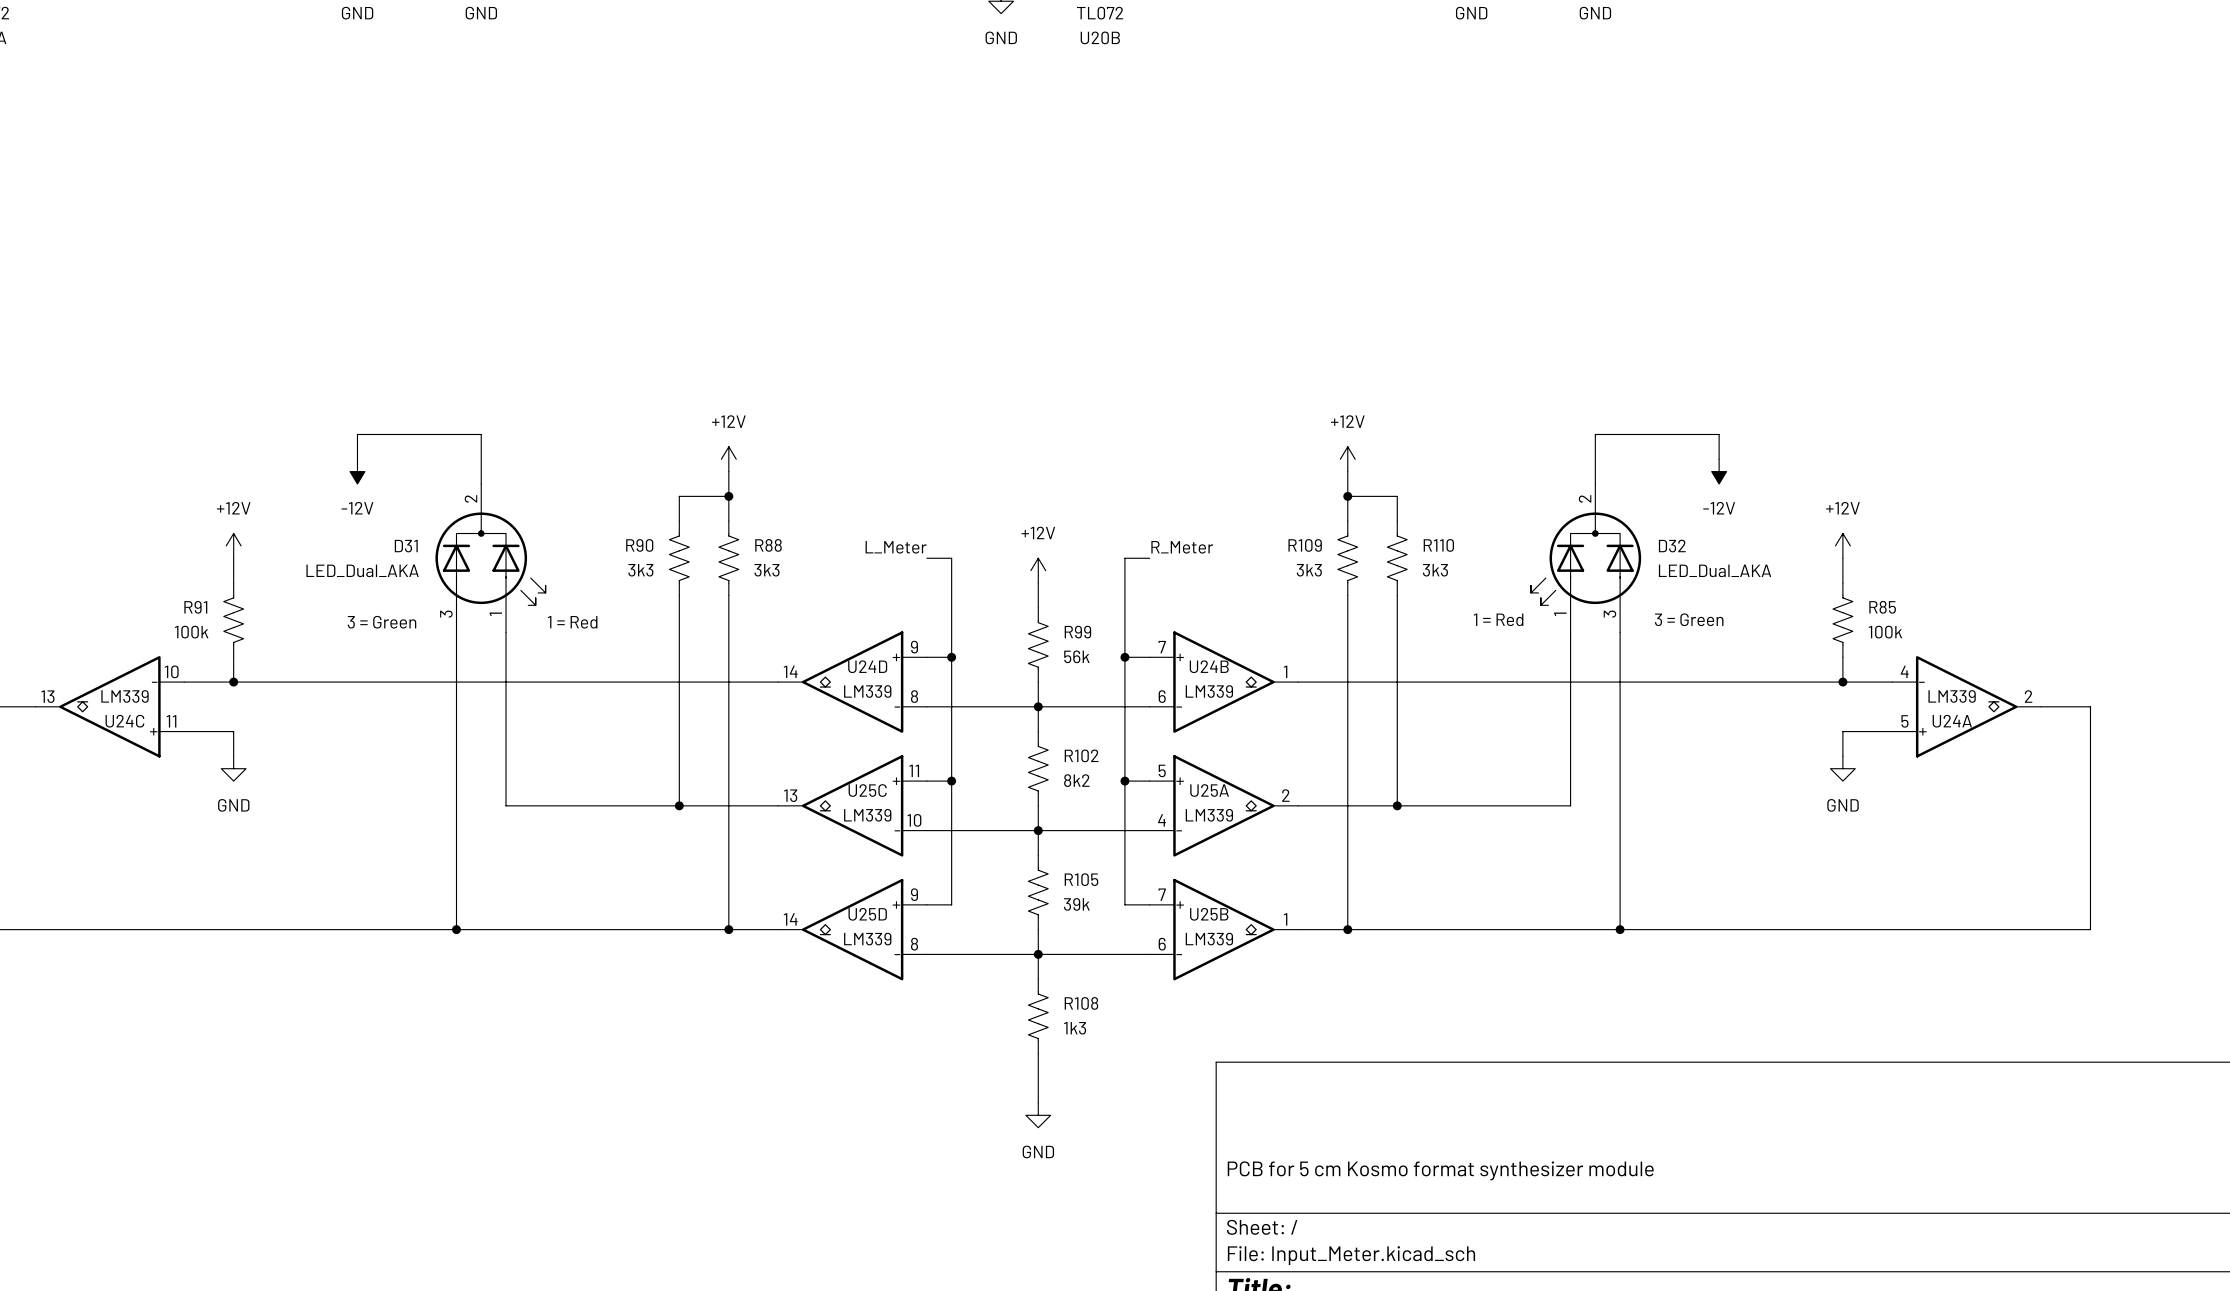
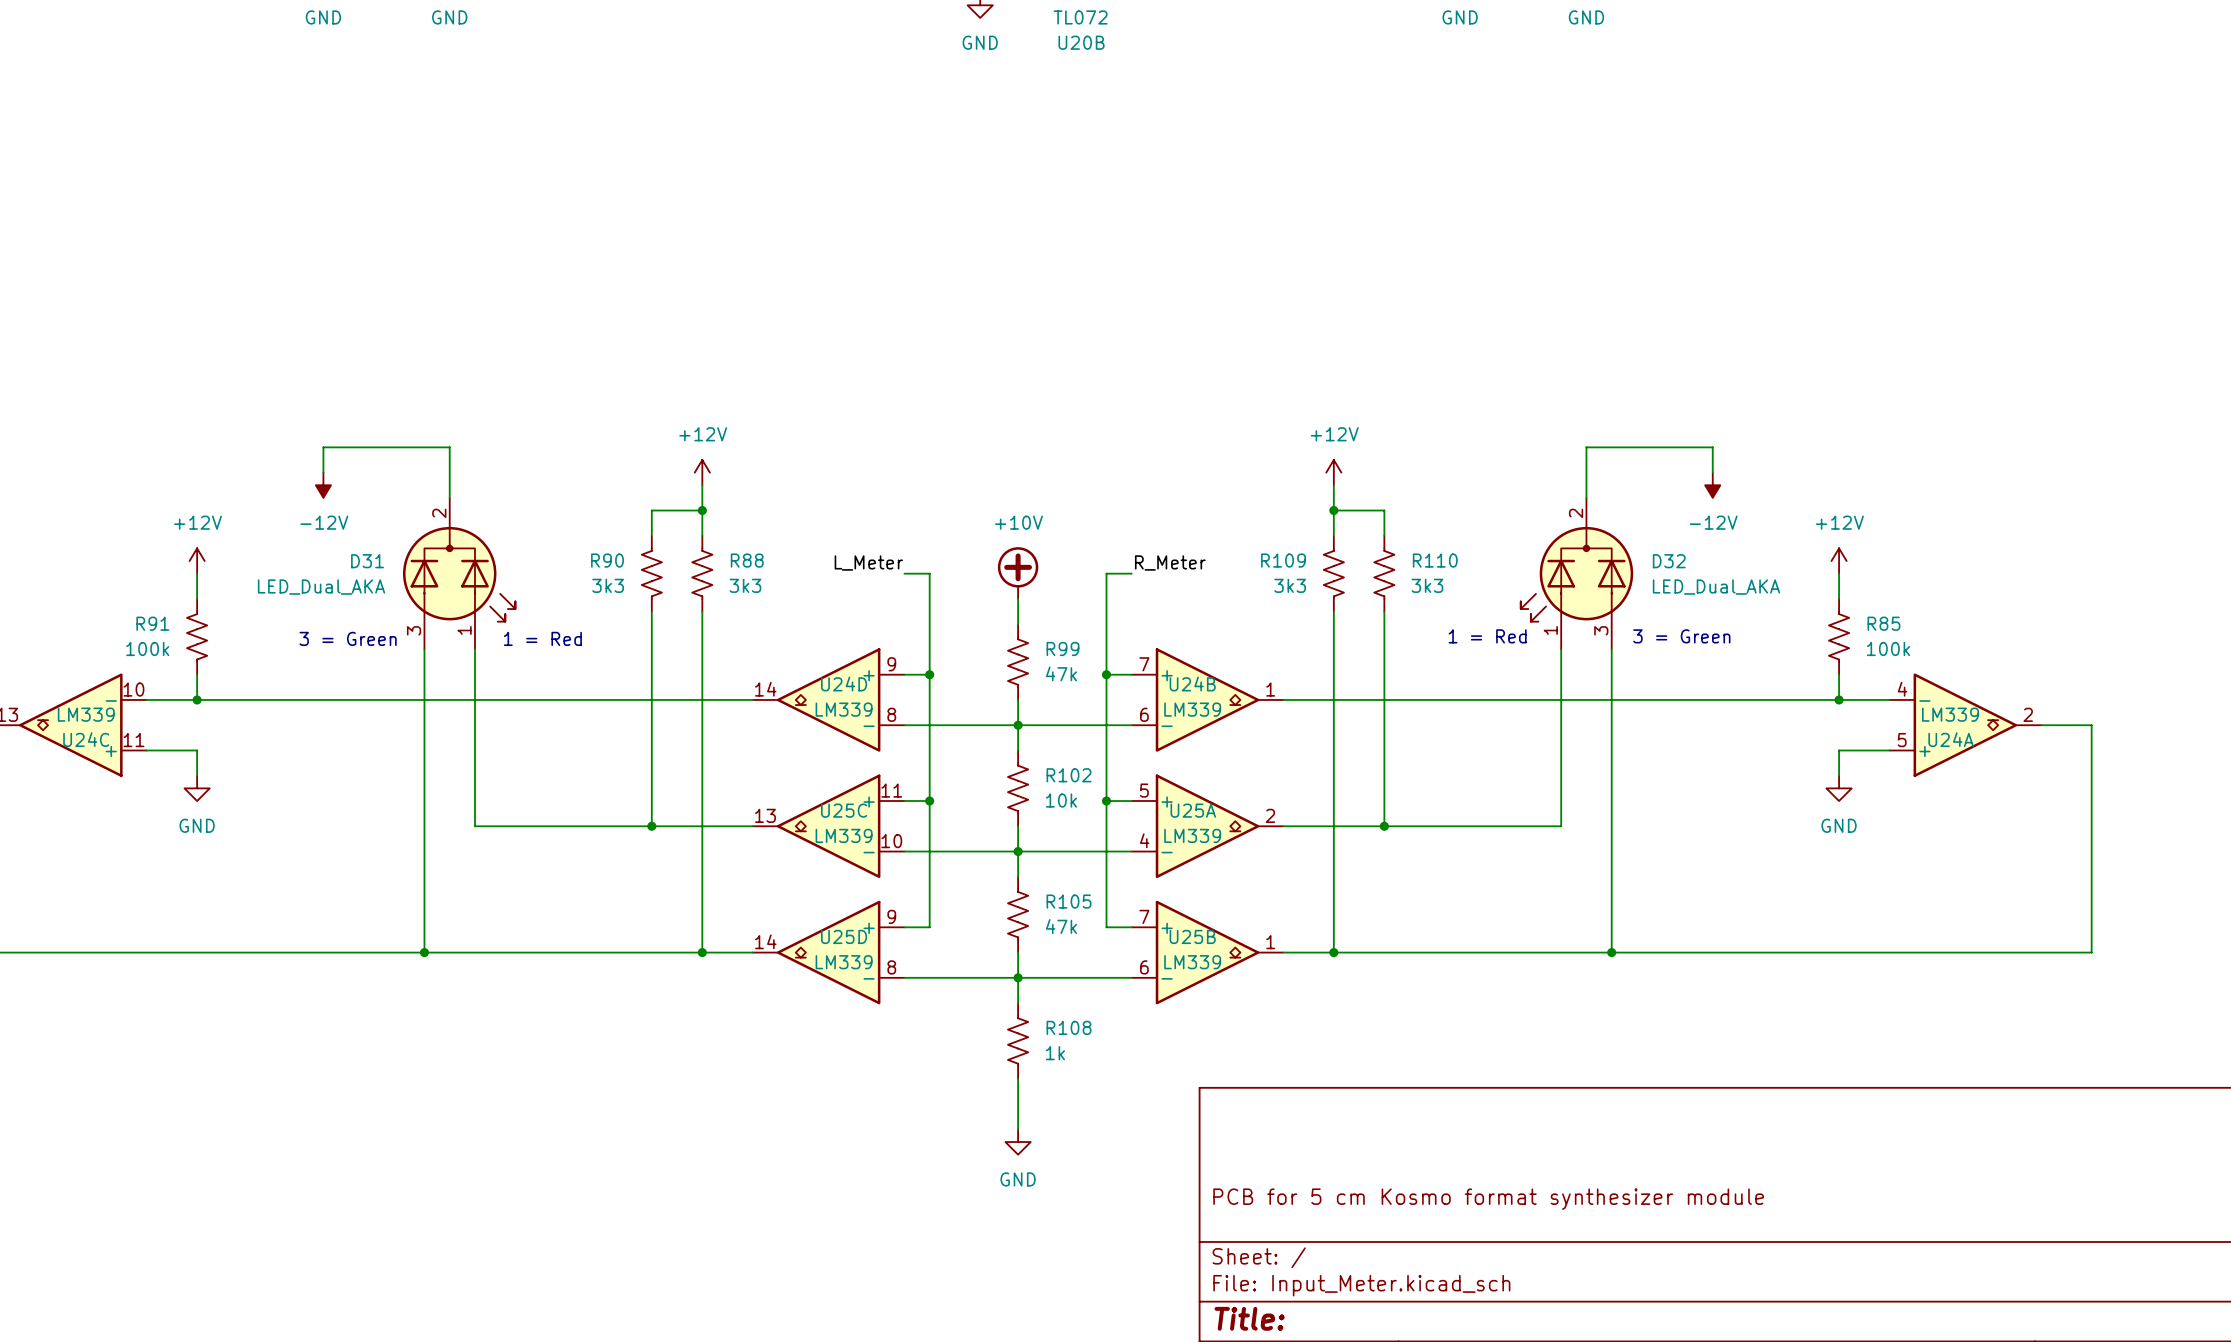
power symbol: none -> +10V (1018, 573)
power symbol: +12V (1038, 570) -> none
R99 value: 56k (1076, 656) -> 47k (1061, 673)
R102 value: 8k2 (1076, 780) -> 10k (1061, 800)
R105 value: 39k (1076, 904) -> 47k (1061, 926)
R108 value: 1k3 (1075, 1028) -> 1k (1055, 1053)

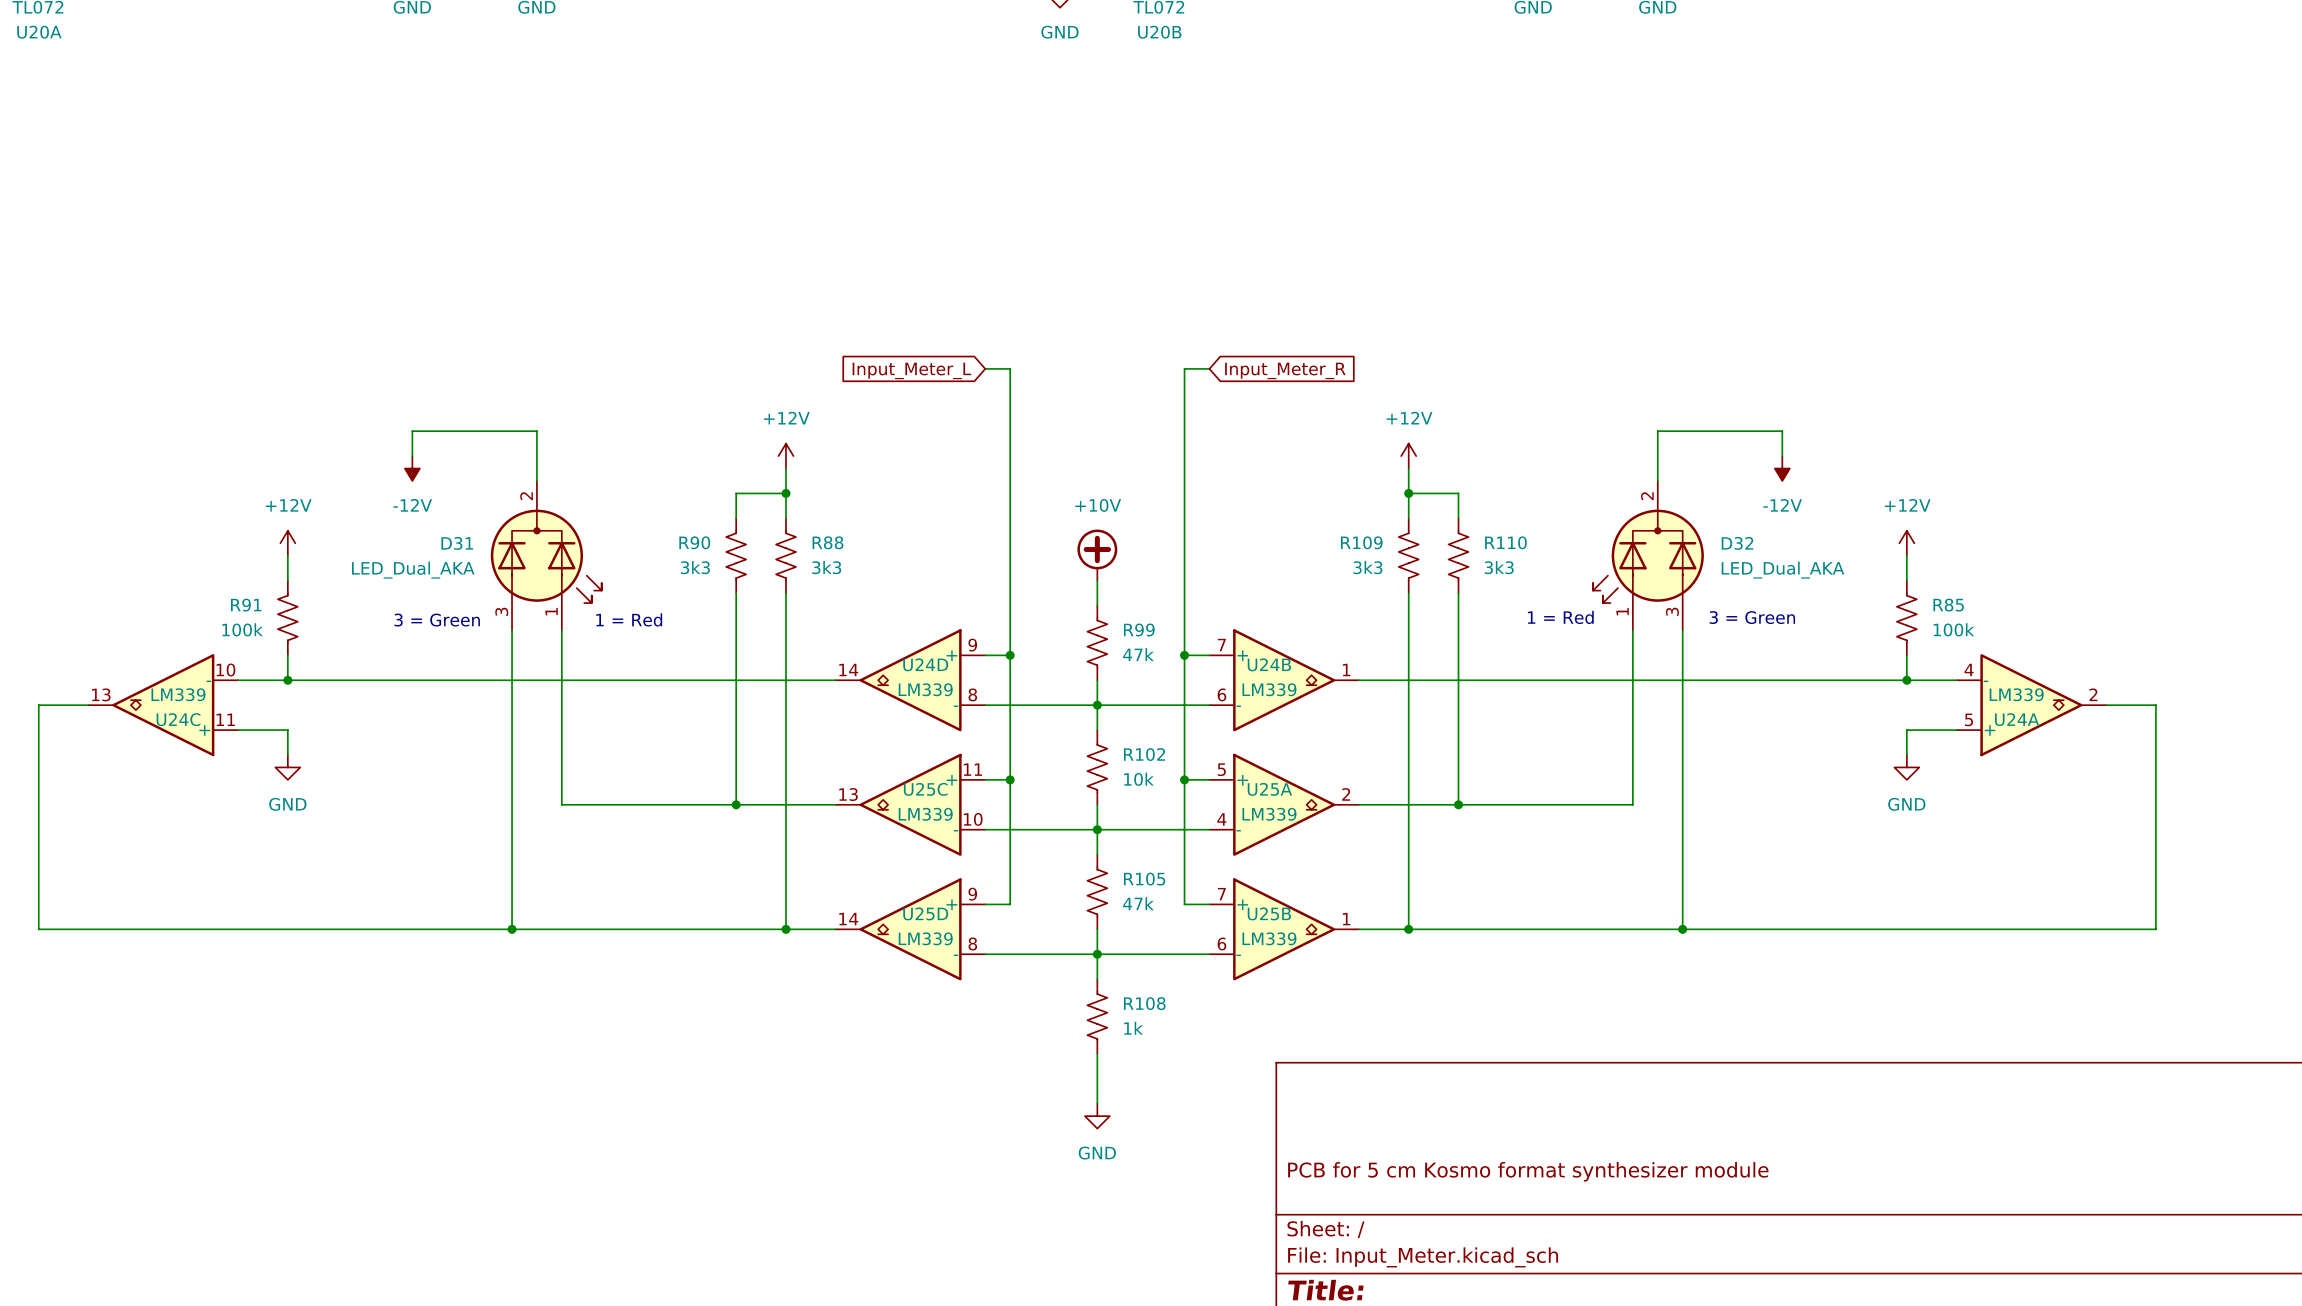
global label: none -> Input_Meter_L (911, 370)
global label: none -> Input_Meter_R (1285, 370)
label: L_Meter (868, 563) -> none
label: R_Meter (1170, 563) -> none
wire: (904, 573) (929, 573) -> (985, 368) (1010, 368) (1010, 555)
wire: (1106, 573) (1131, 573) -> (1184, 555) (1184, 368) (1209, 368)

